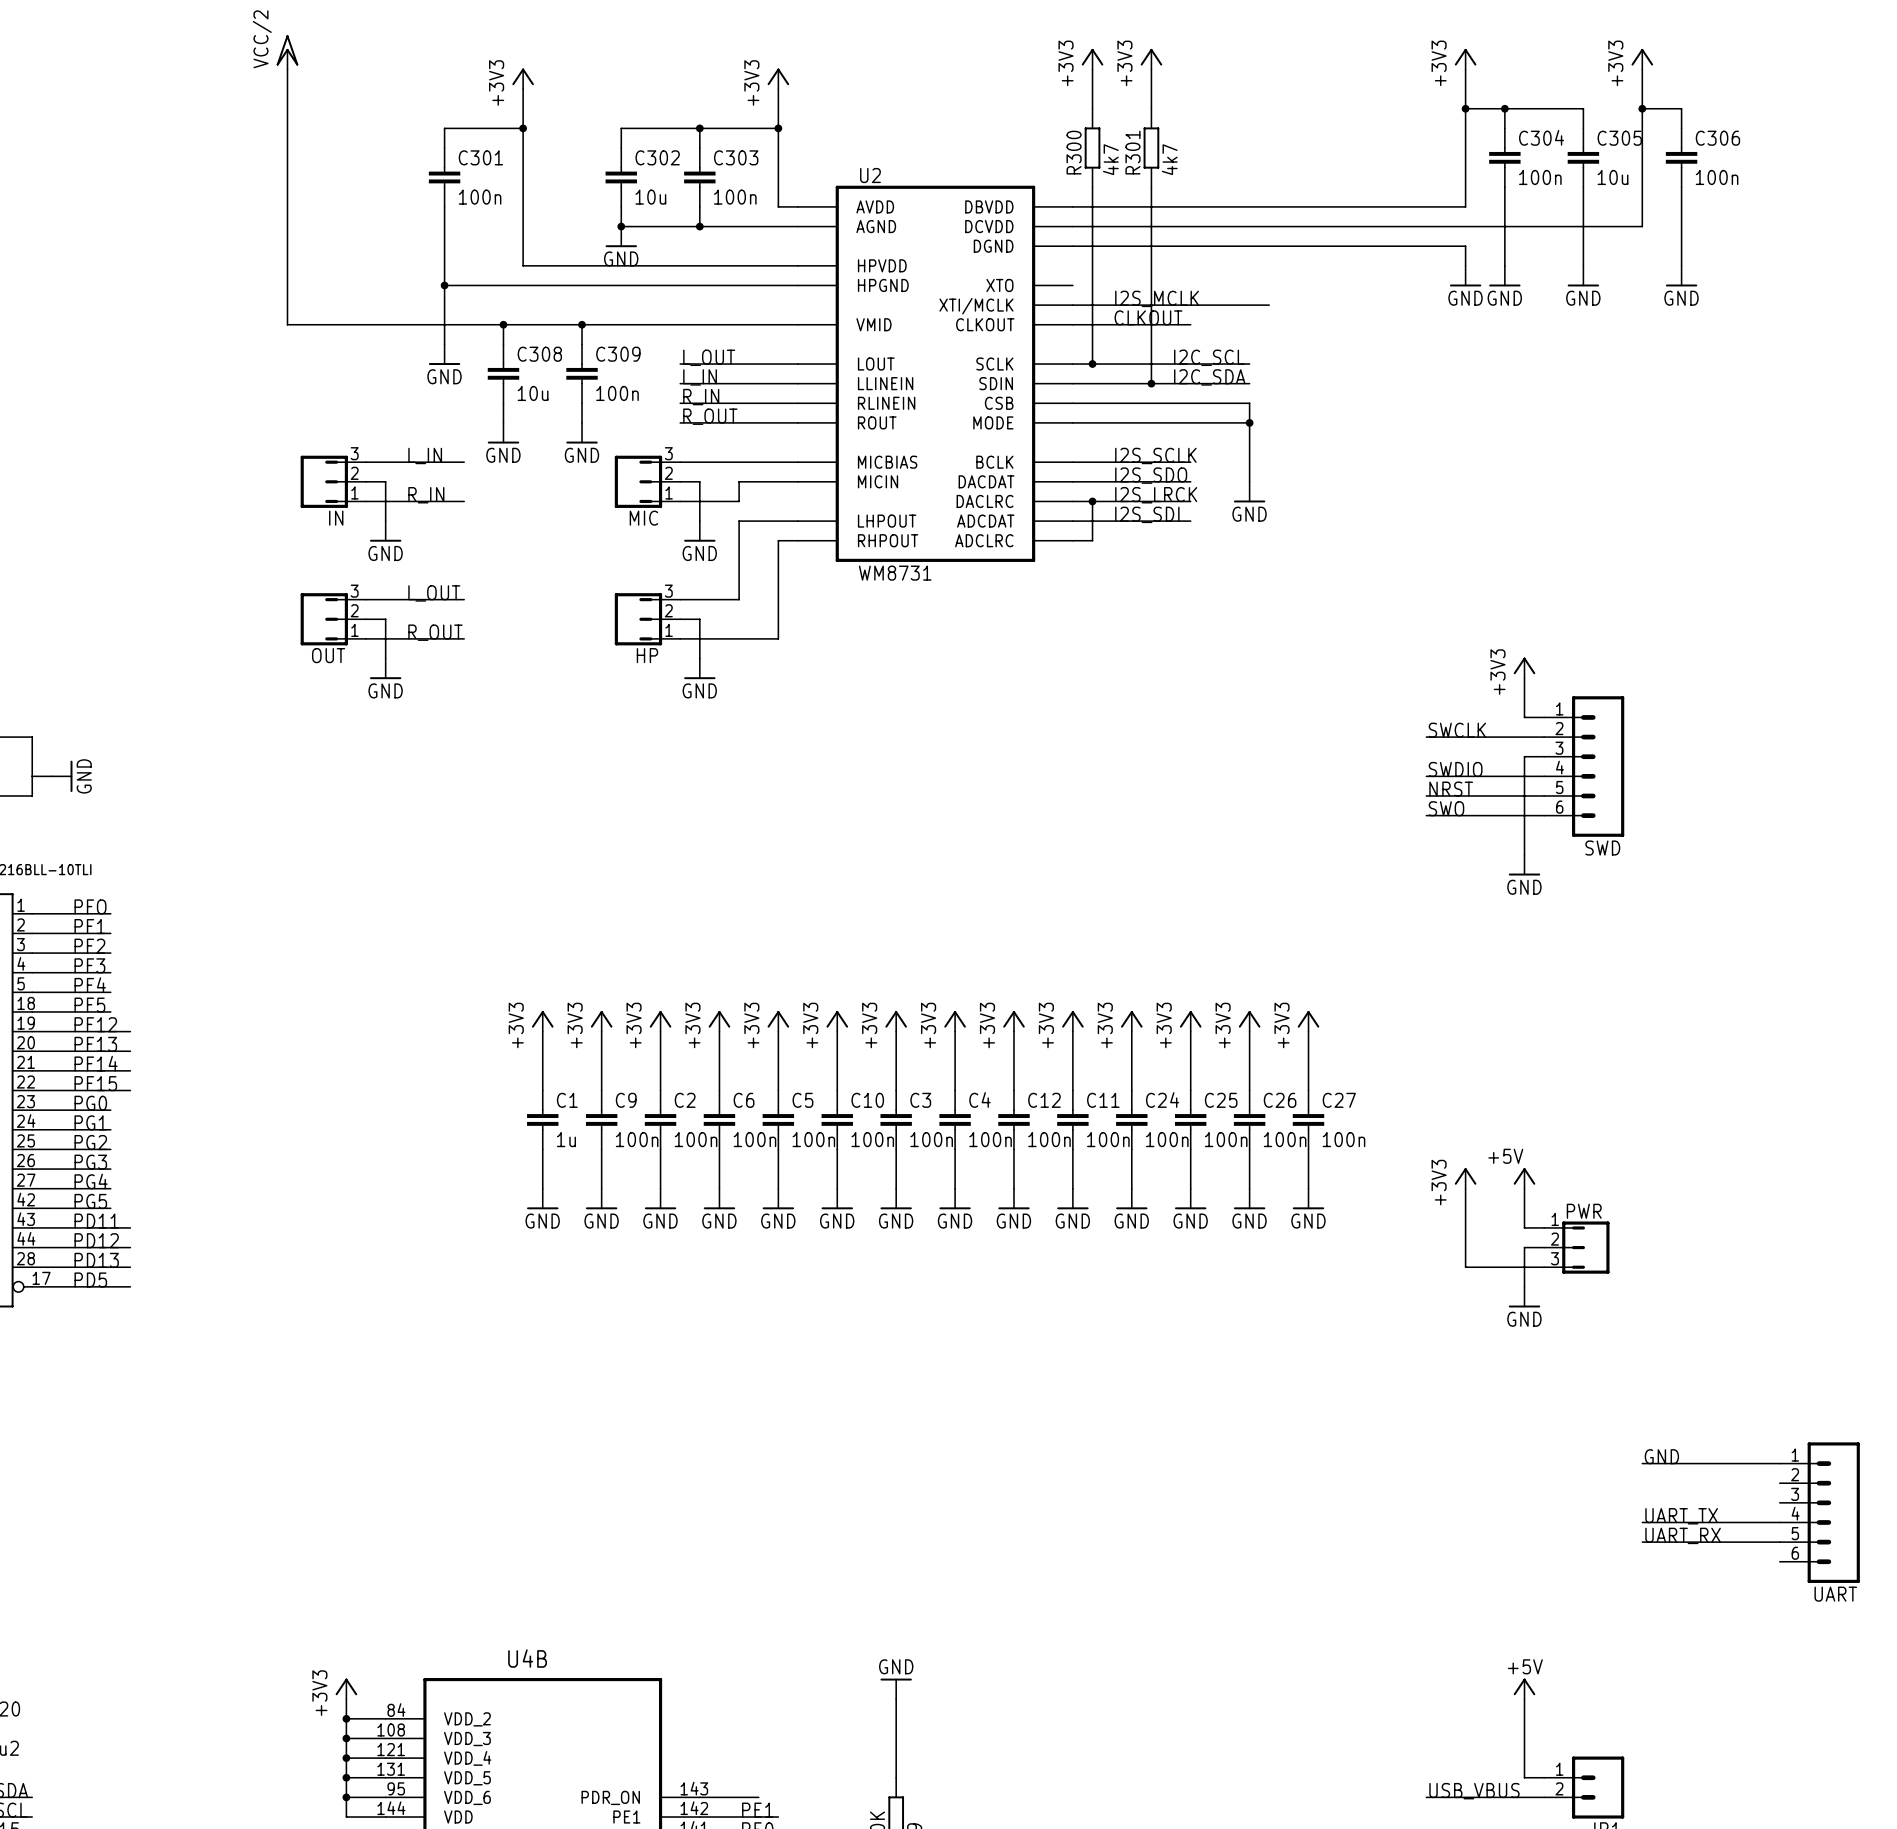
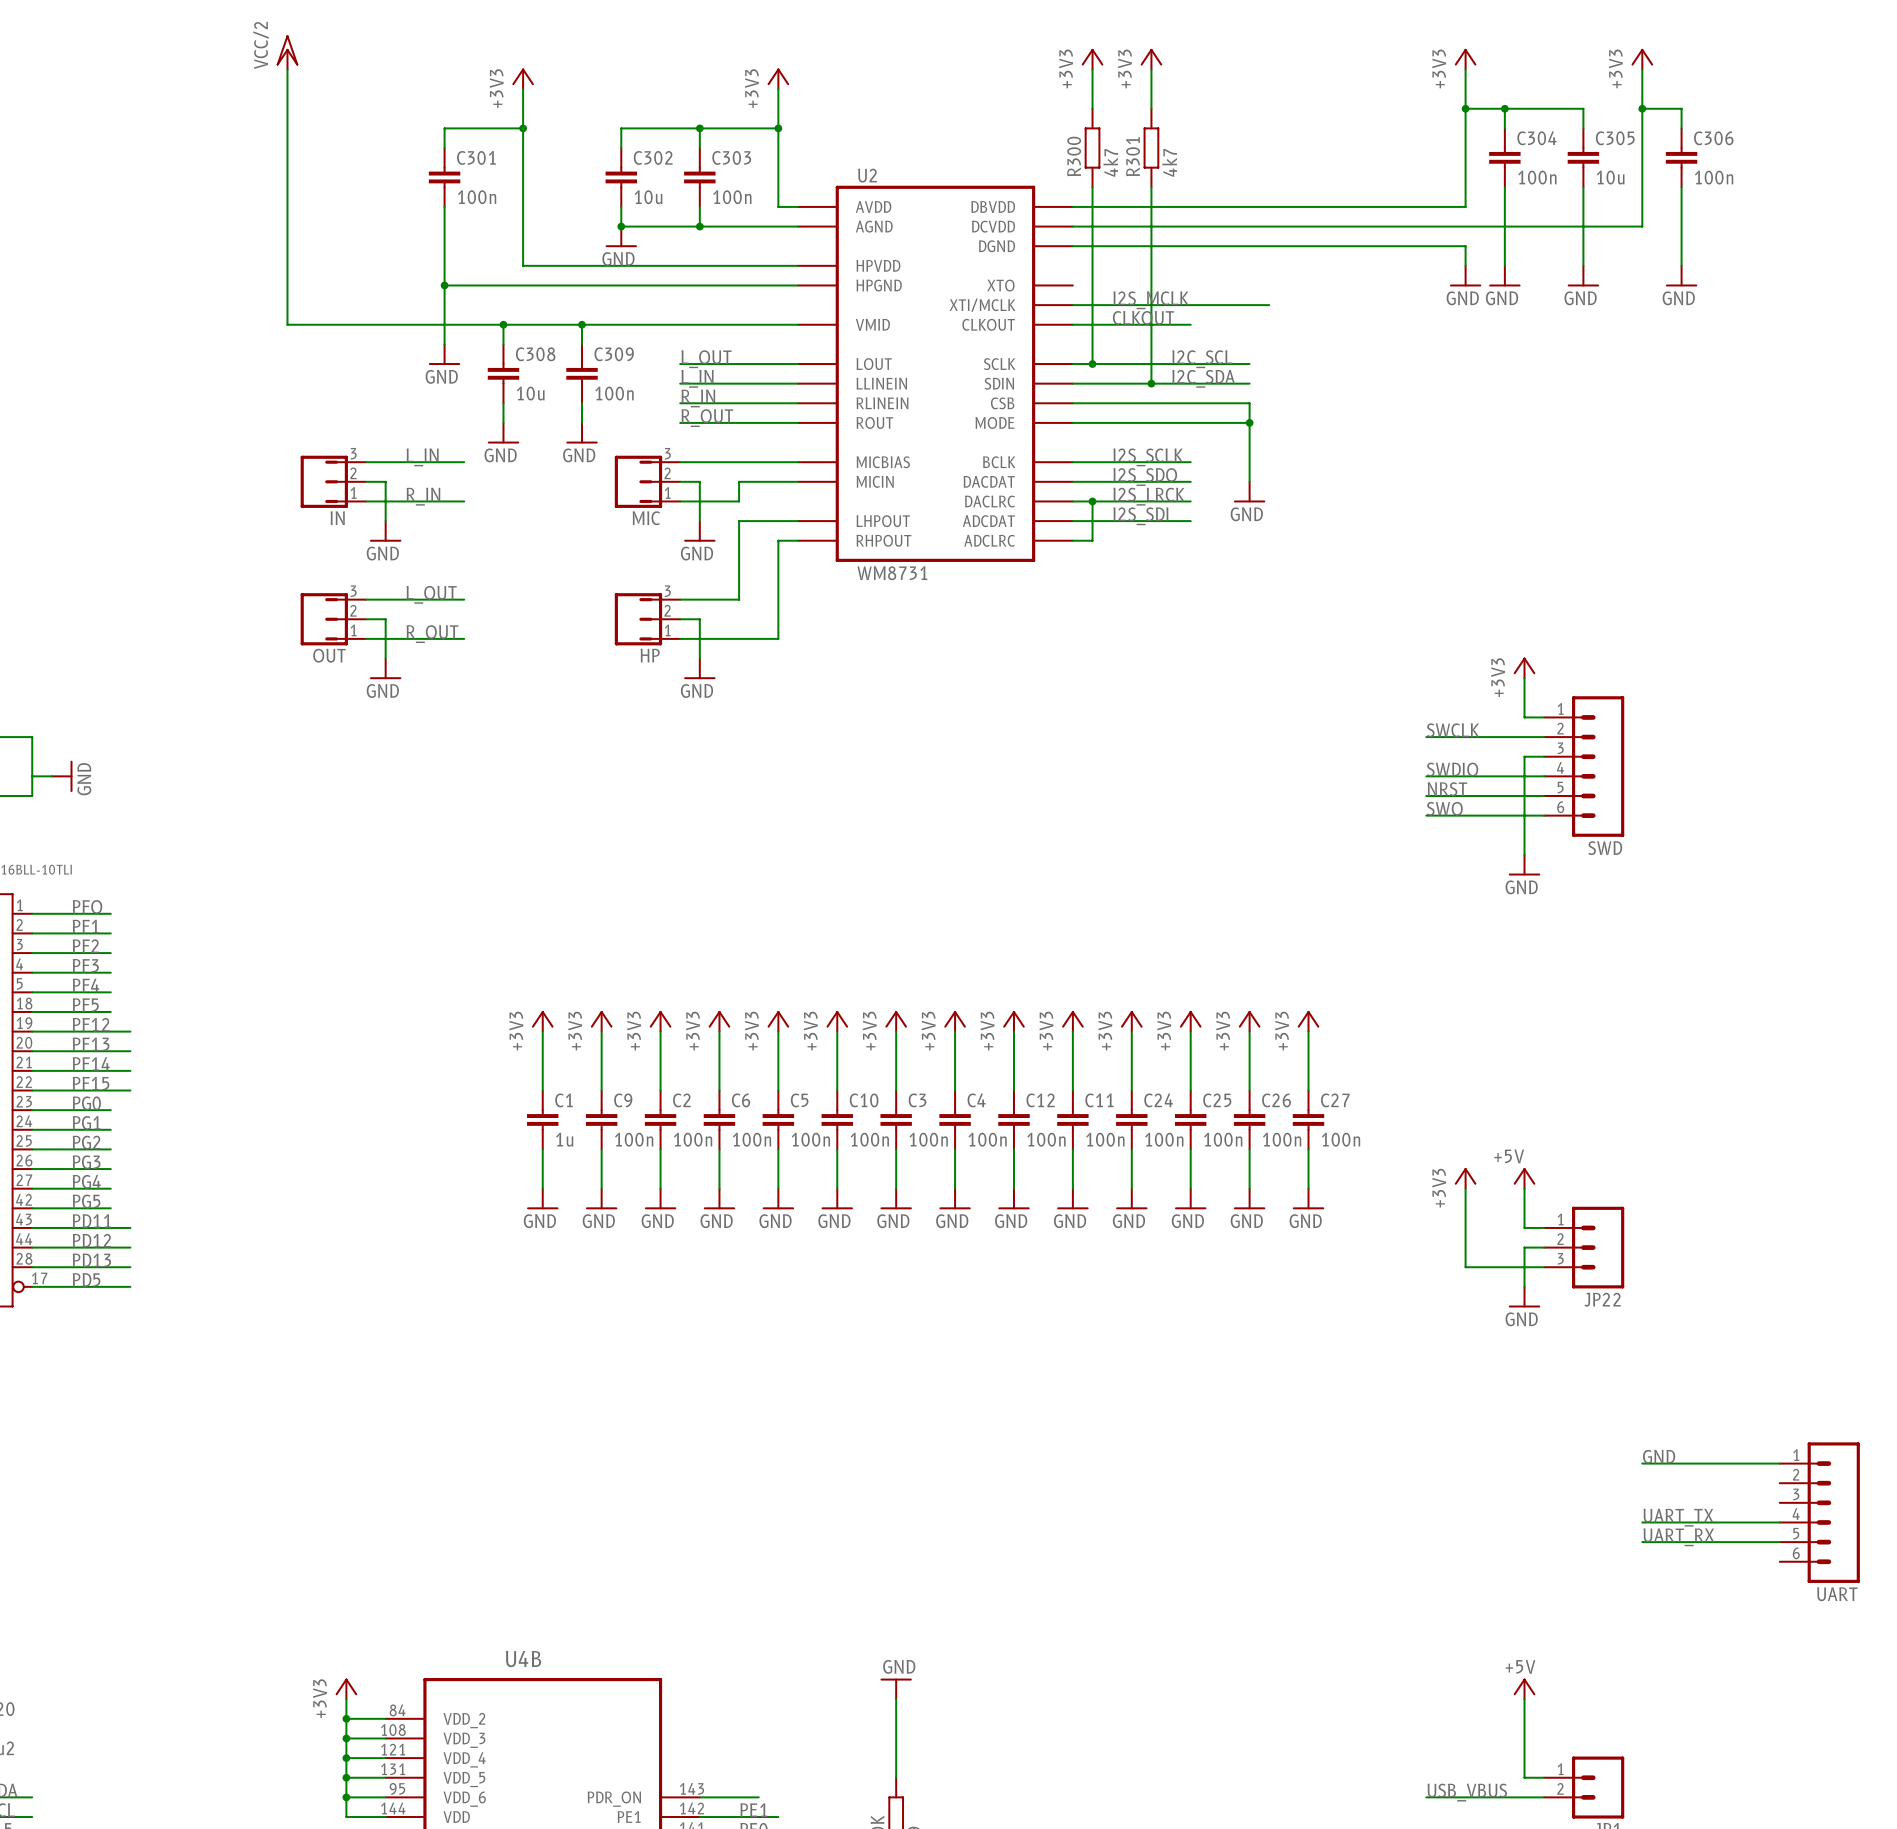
PWR: (1576, 1247) -> none
JP22: none -> (1584, 1247)

